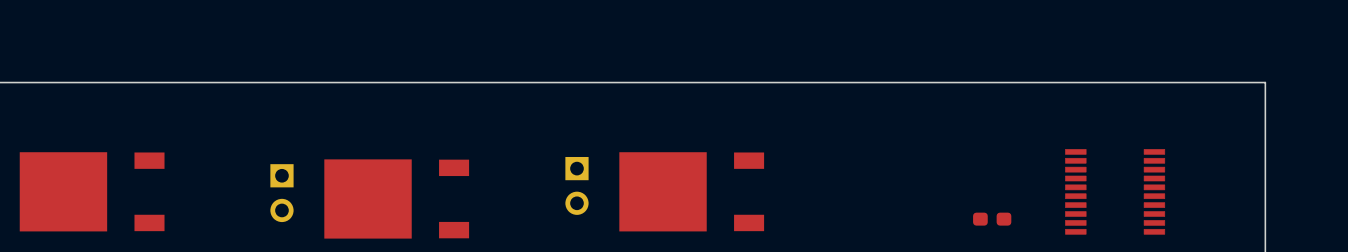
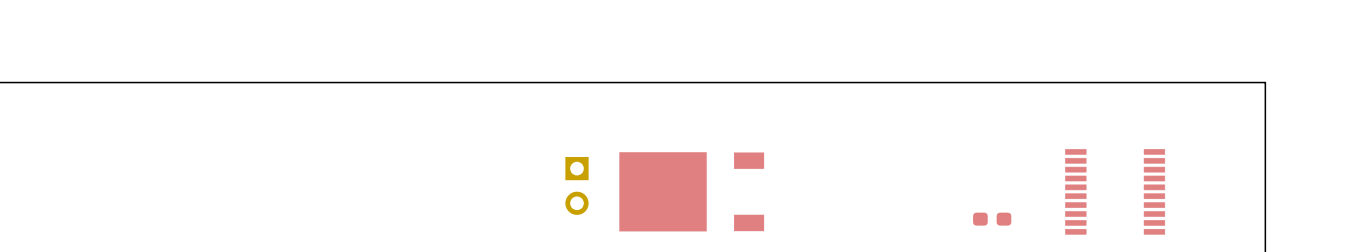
part: (92, 191) -> none
part: (281, 193) -> none
part: (396, 198) -> none

